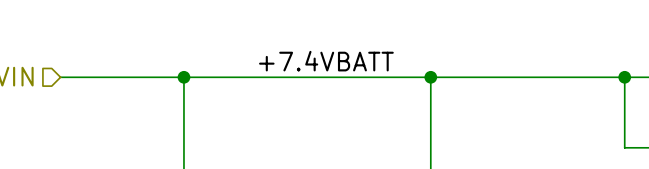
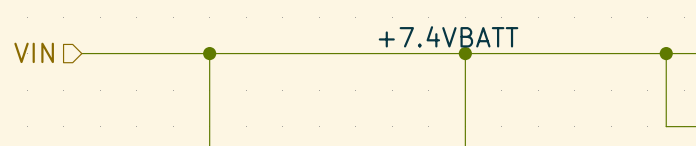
label position: +7.4VBATT (326, 61) -> +7.4VBATT (448, 36)

